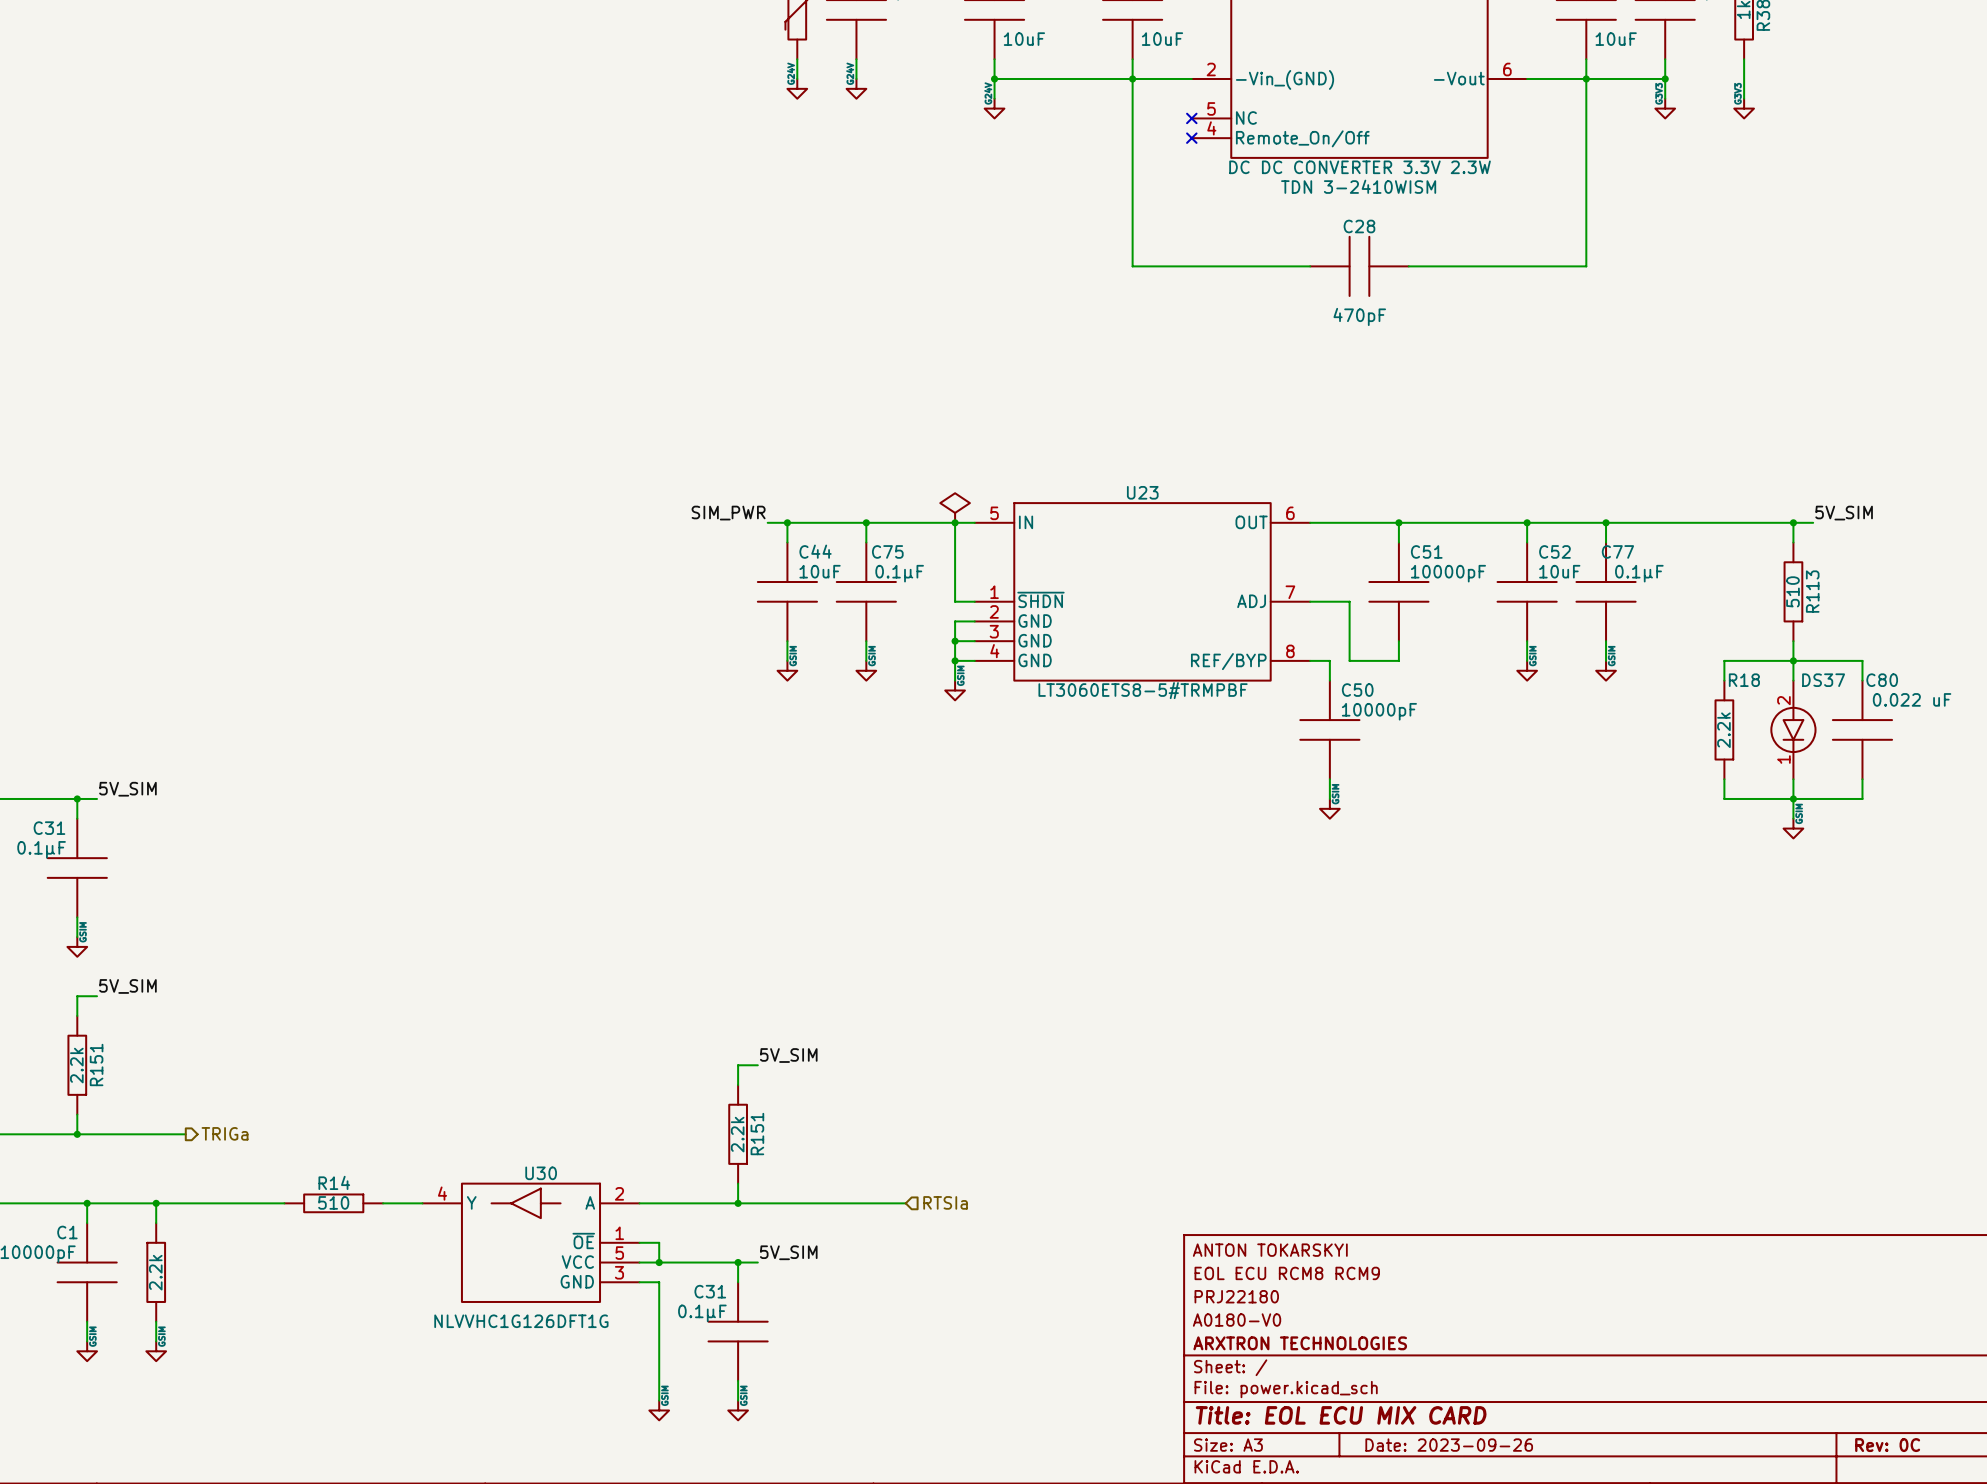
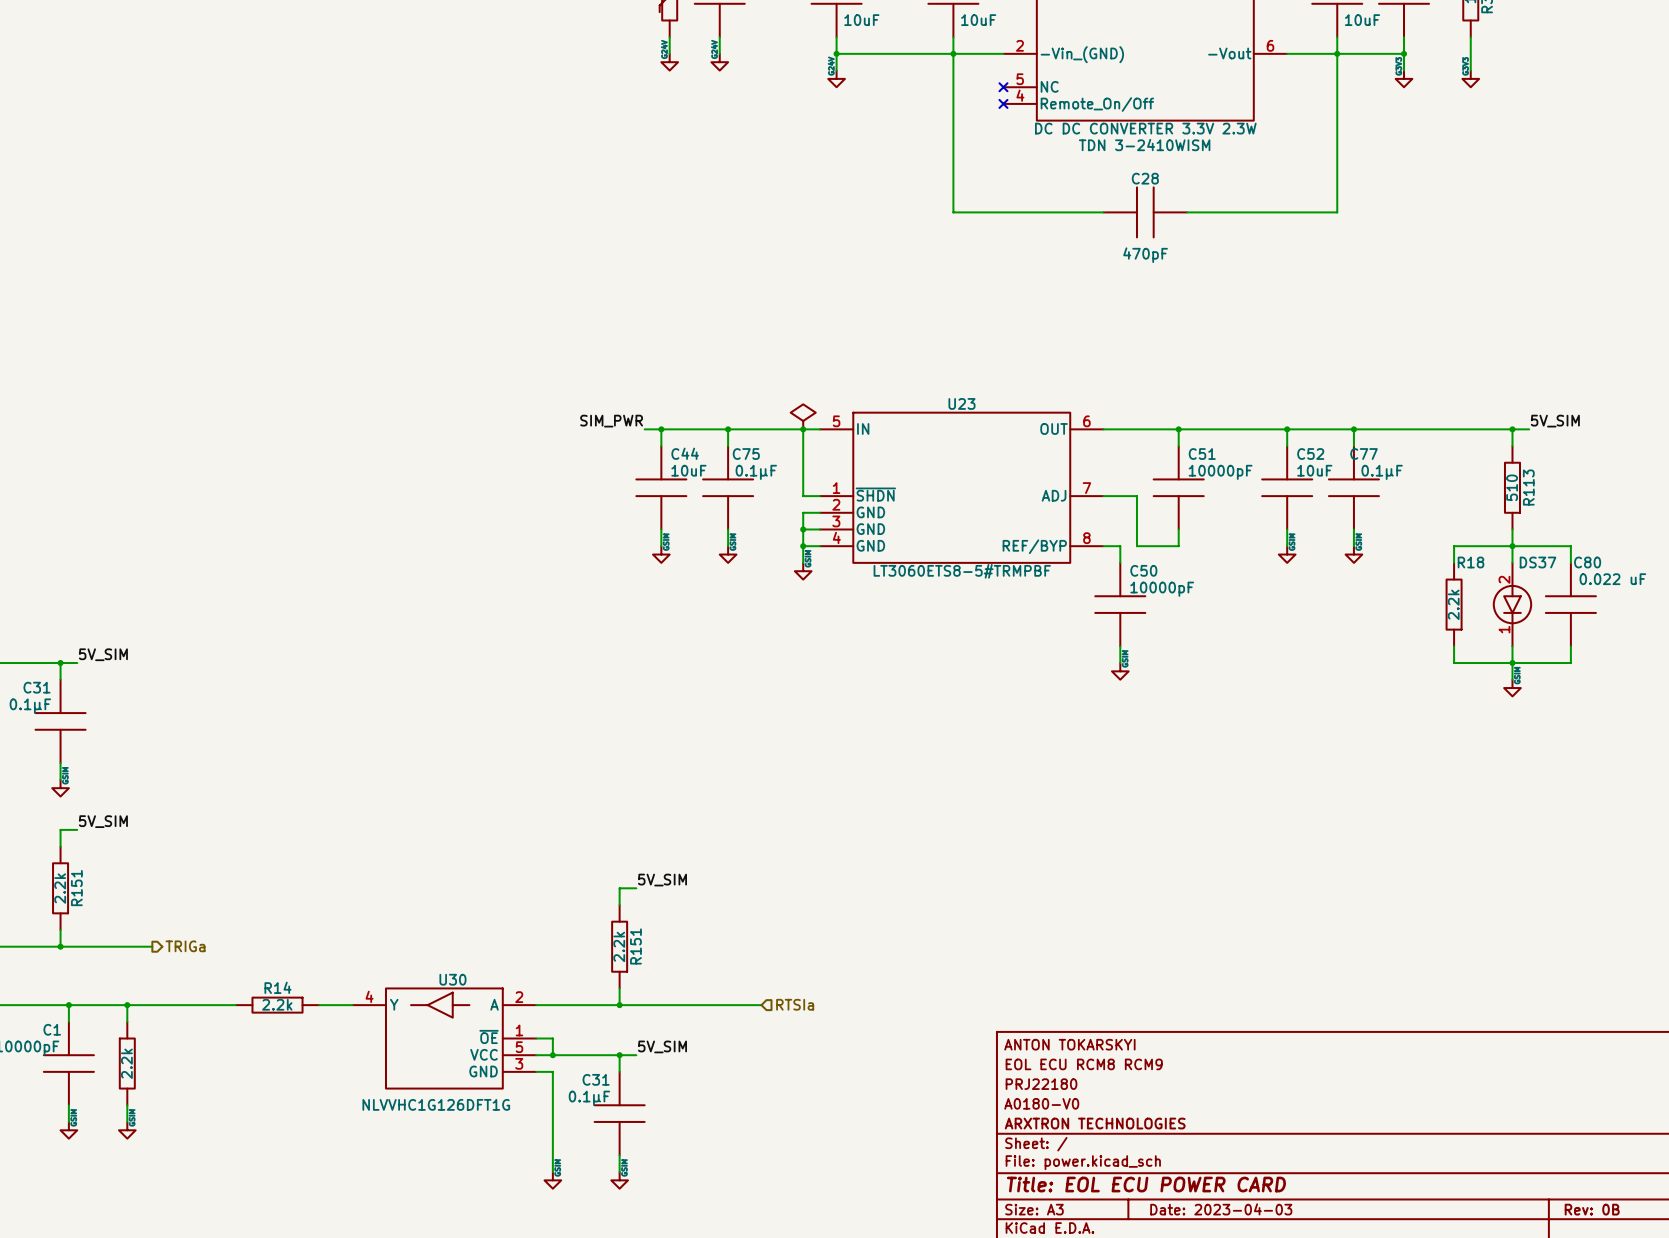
R14 text: 510 (333, 1202) -> 2.2k (277, 1004)
title block: Title: EOL ECU MIX CARD (1341, 1415) -> Title: EOL ECU POWER CARD (1146, 1184)
title block: Date: 2023-09-26 (1449, 1445) -> Date: 2023-04-03 (1221, 1209)
title block: Rev: 0C (1887, 1445) -> Rev: 0B (1592, 1209)

